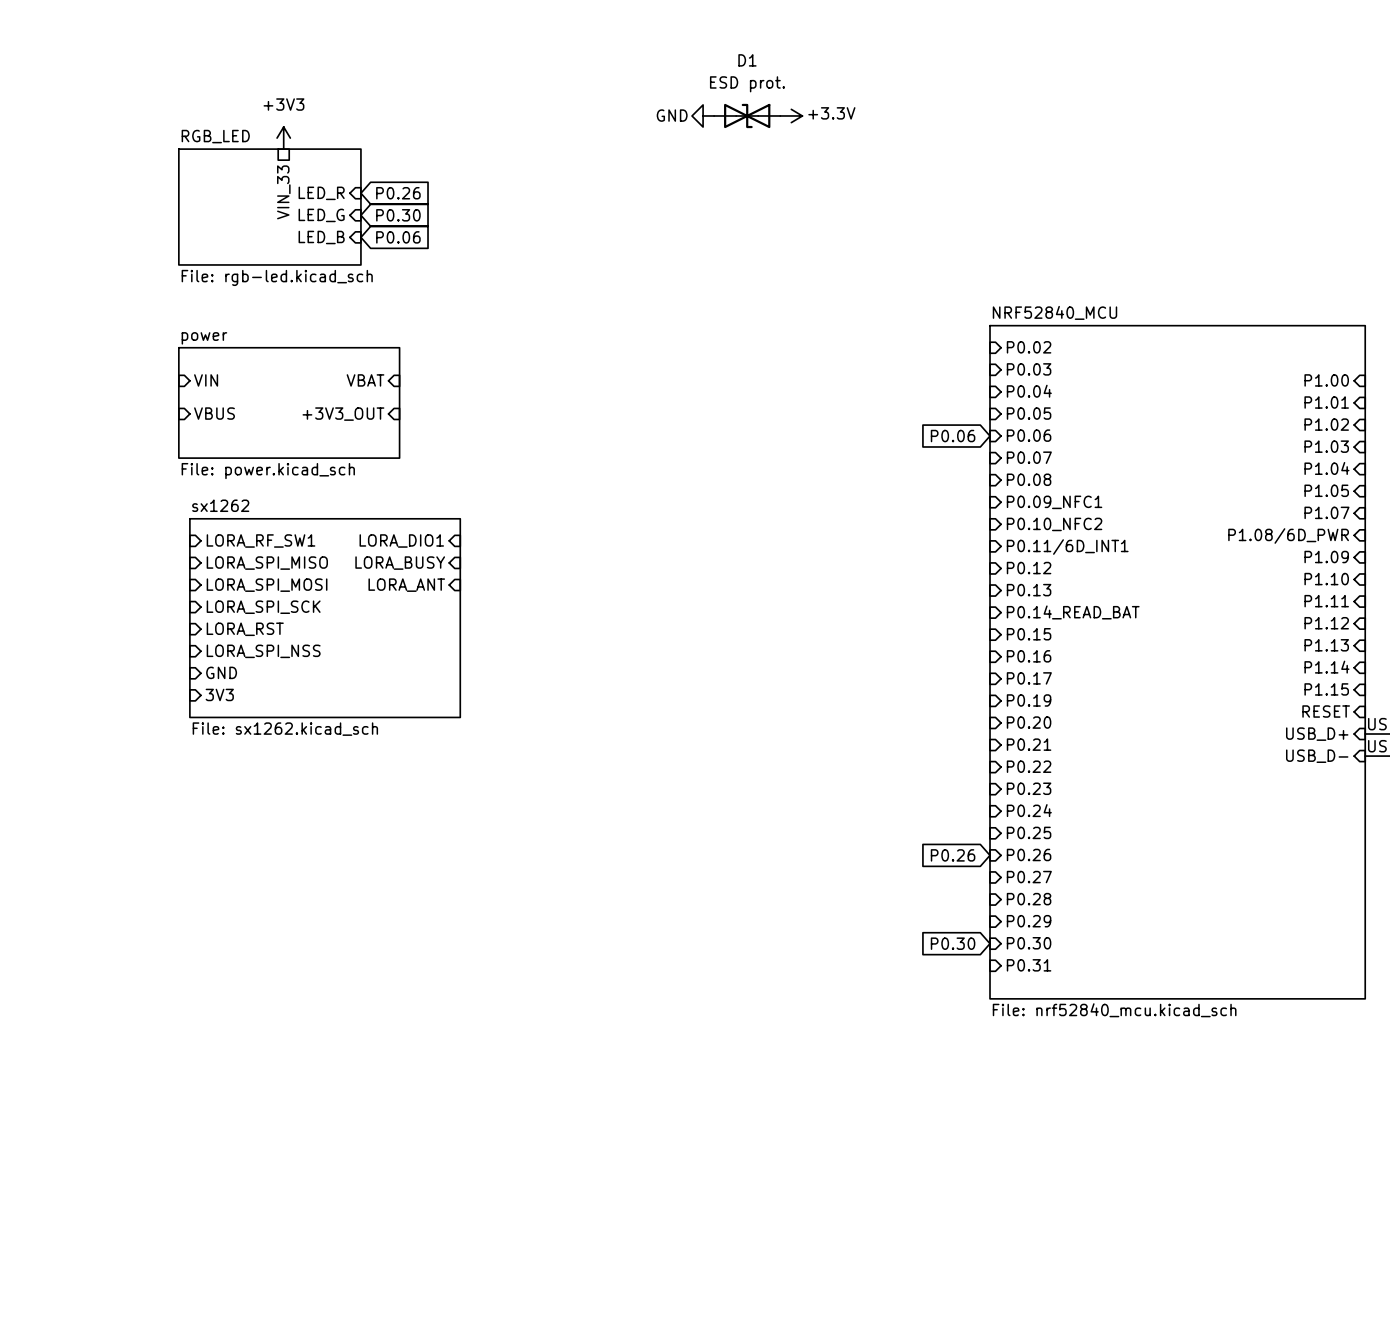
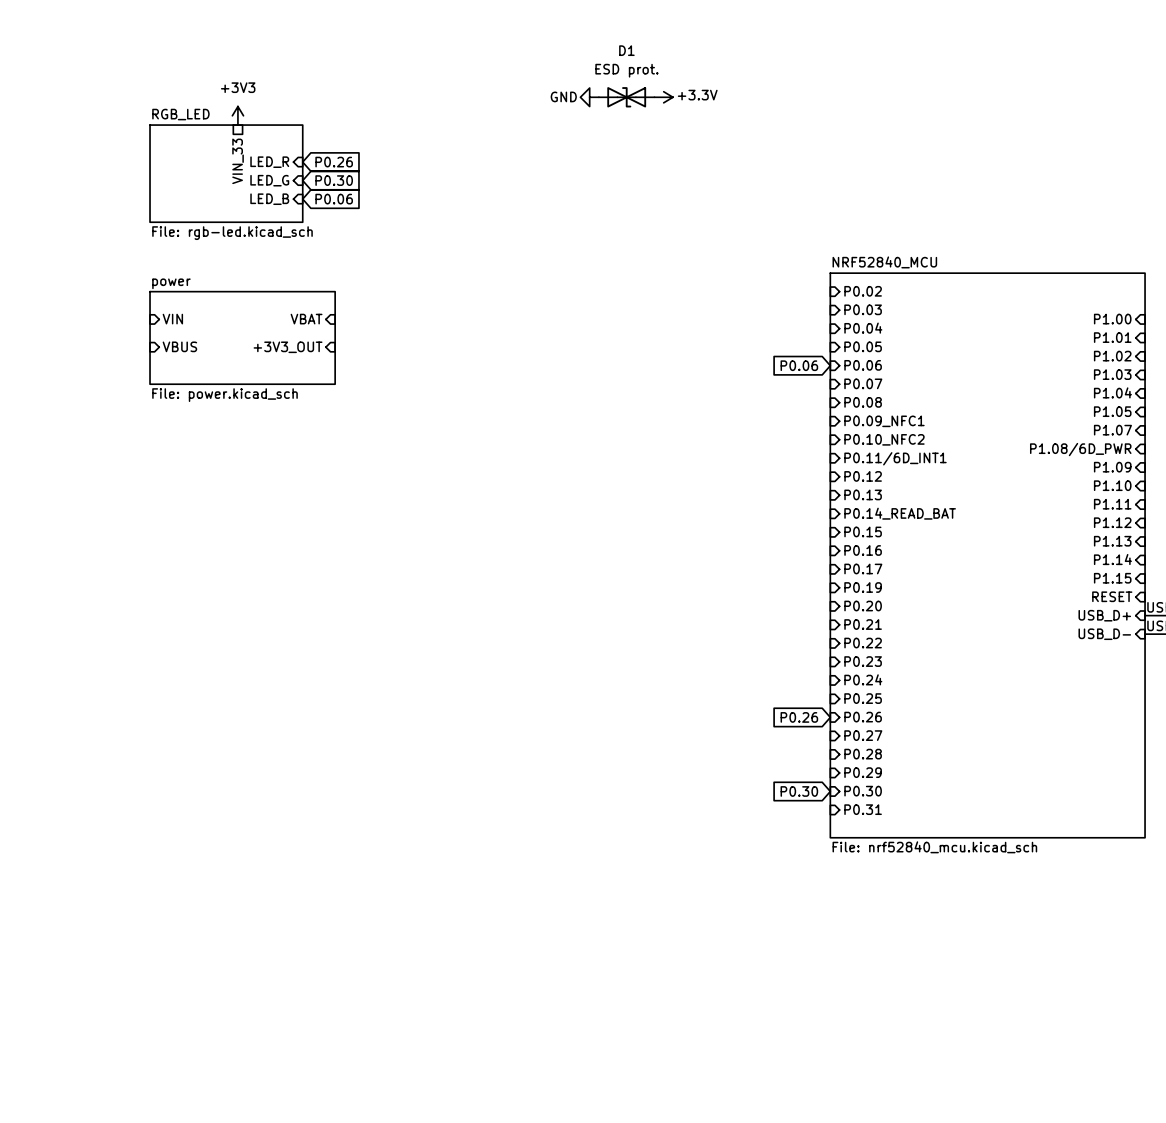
sheet pin: LORA_RF_SW1 (261, 540) -> none
sheet pin: LORA_DIO1 (401, 540) -> none
sheet pin: LORA_SPI_MISO (267, 563) -> none
sheet pin: LORA_BUSY (400, 563) -> none
sheet pin: LORA_SPI_MOSI (267, 585) -> none
sheet pin: LORA_ANT (406, 585) -> none
sheet pin: LORA_SPI_SCK (263, 607) -> none
sheet sx1262: File: sx1262.kicad_sch (325, 618) -> none
sheet pin: LORA_RST (245, 629) -> none
sheet pin: LORA_SPI_NSS (263, 651) -> none
sheet pin: GND (221, 672) -> none
sheet pin: 3V3 (219, 694) -> none

